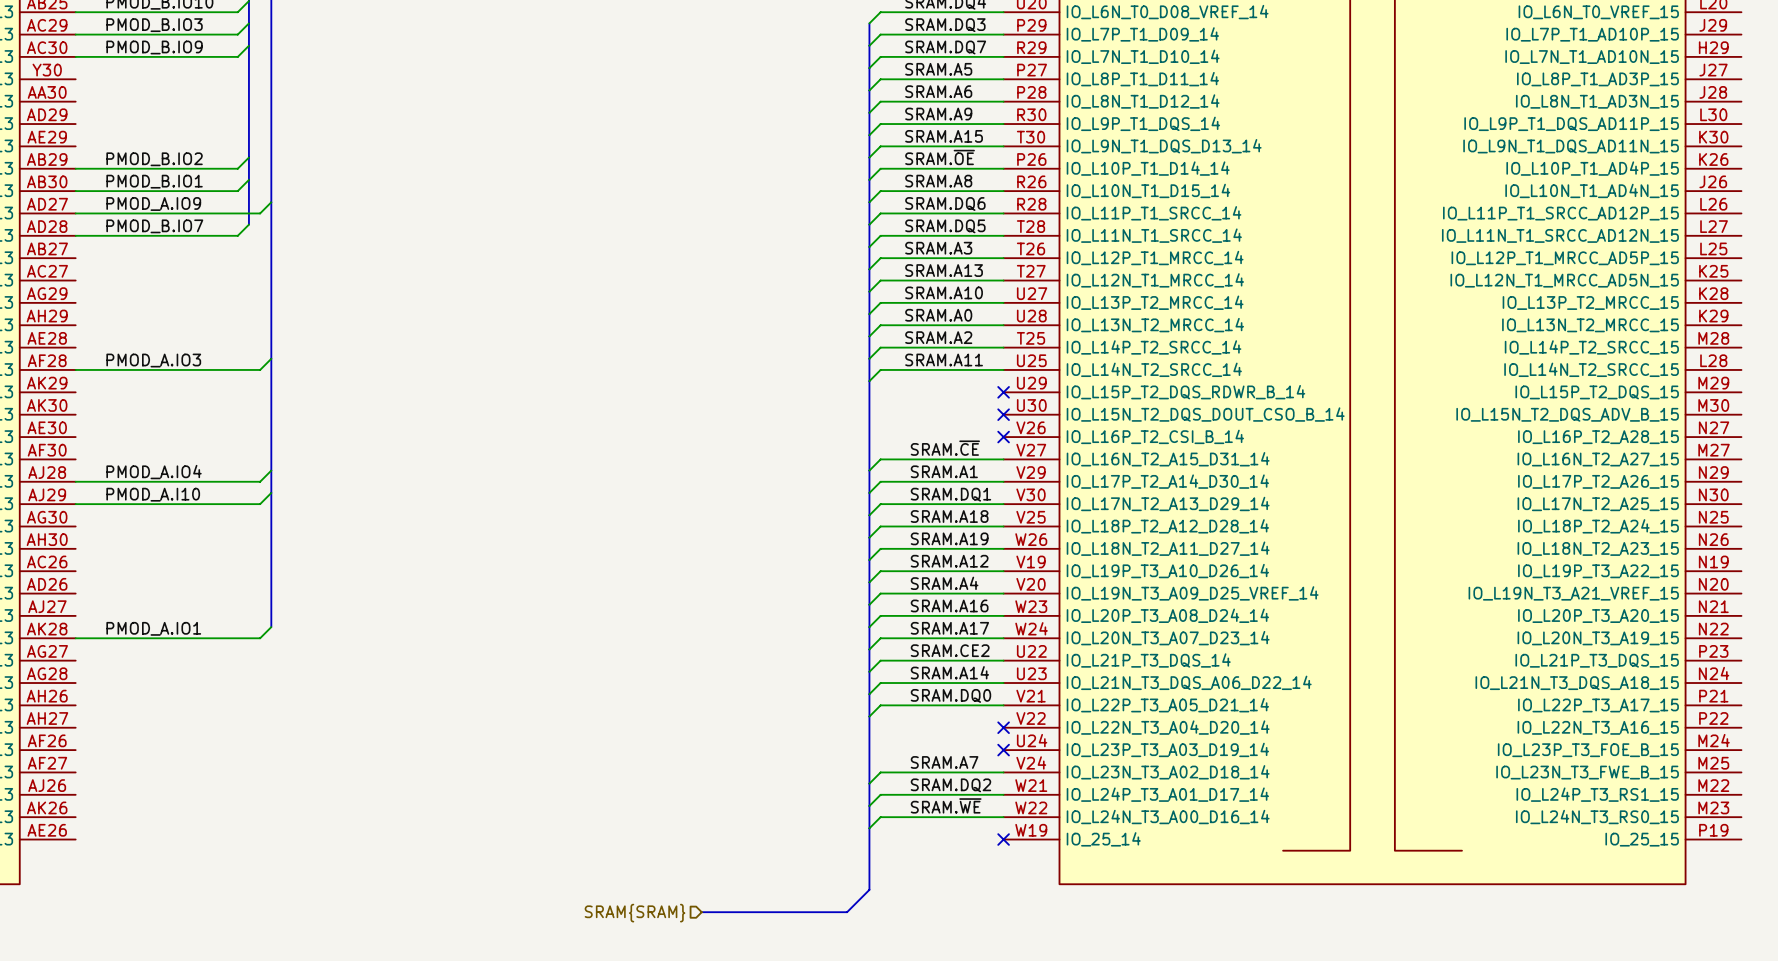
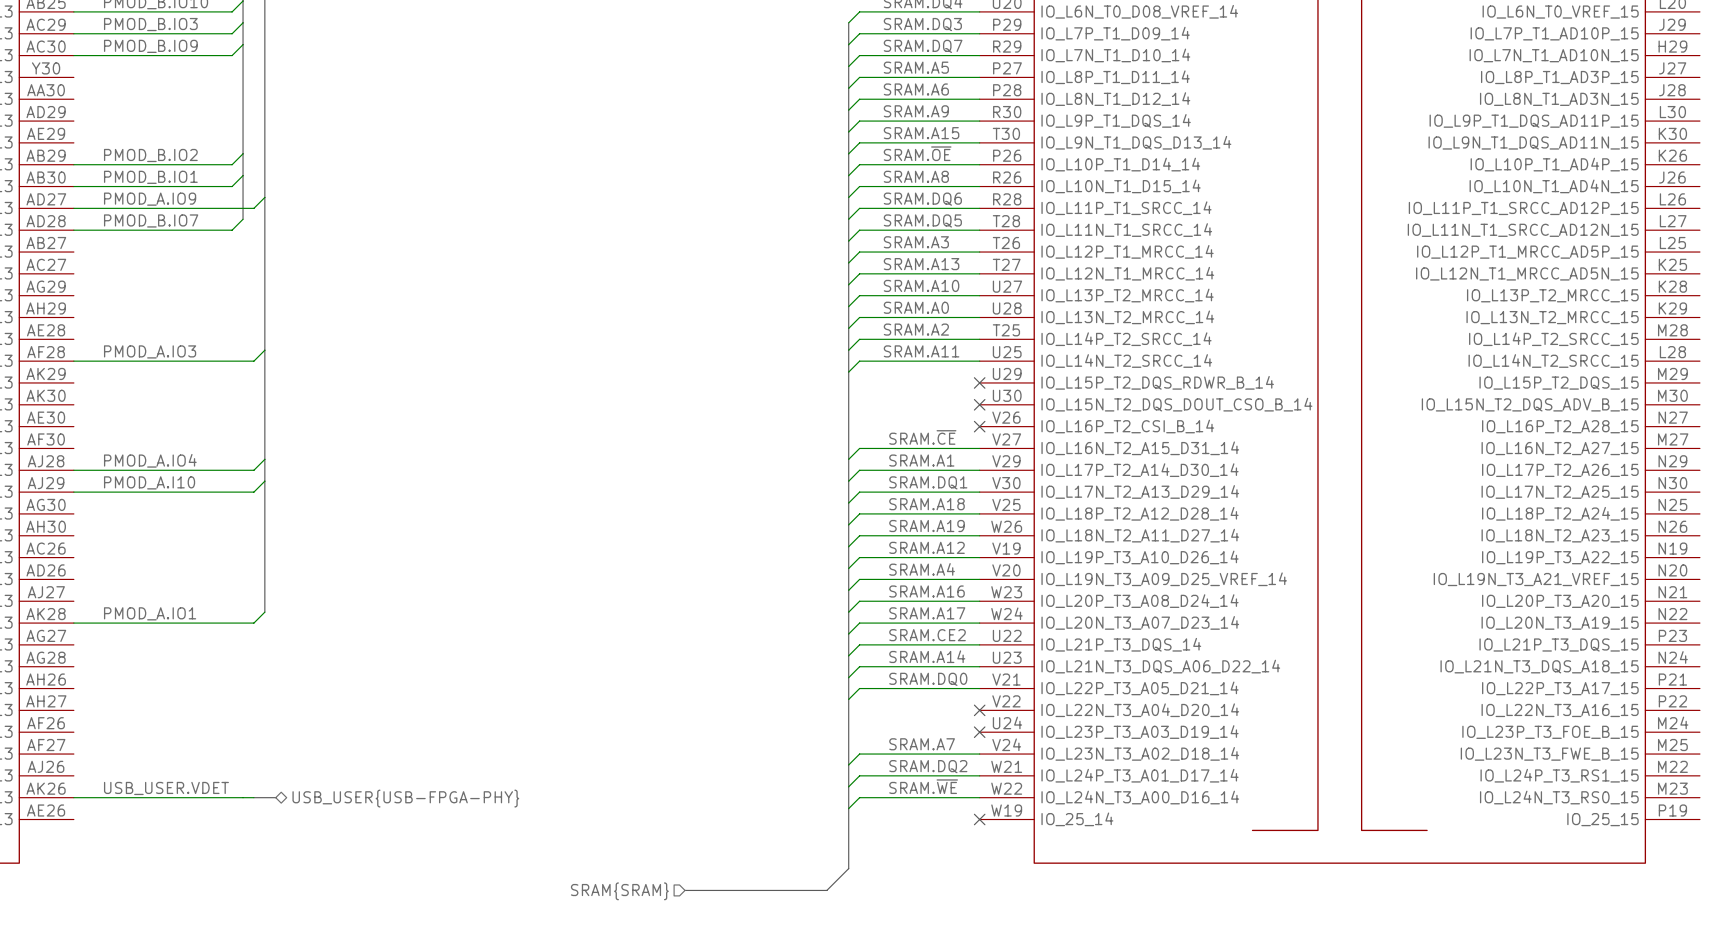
label: none -> USB_USER.VDET (166, 788)
wire: none -> (73, 797) (253, 797)
bus: none -> (253, 797) (275, 797)
hierarchical label: none -> USB_USER{USB-FPGA-PHY} (405, 798)

